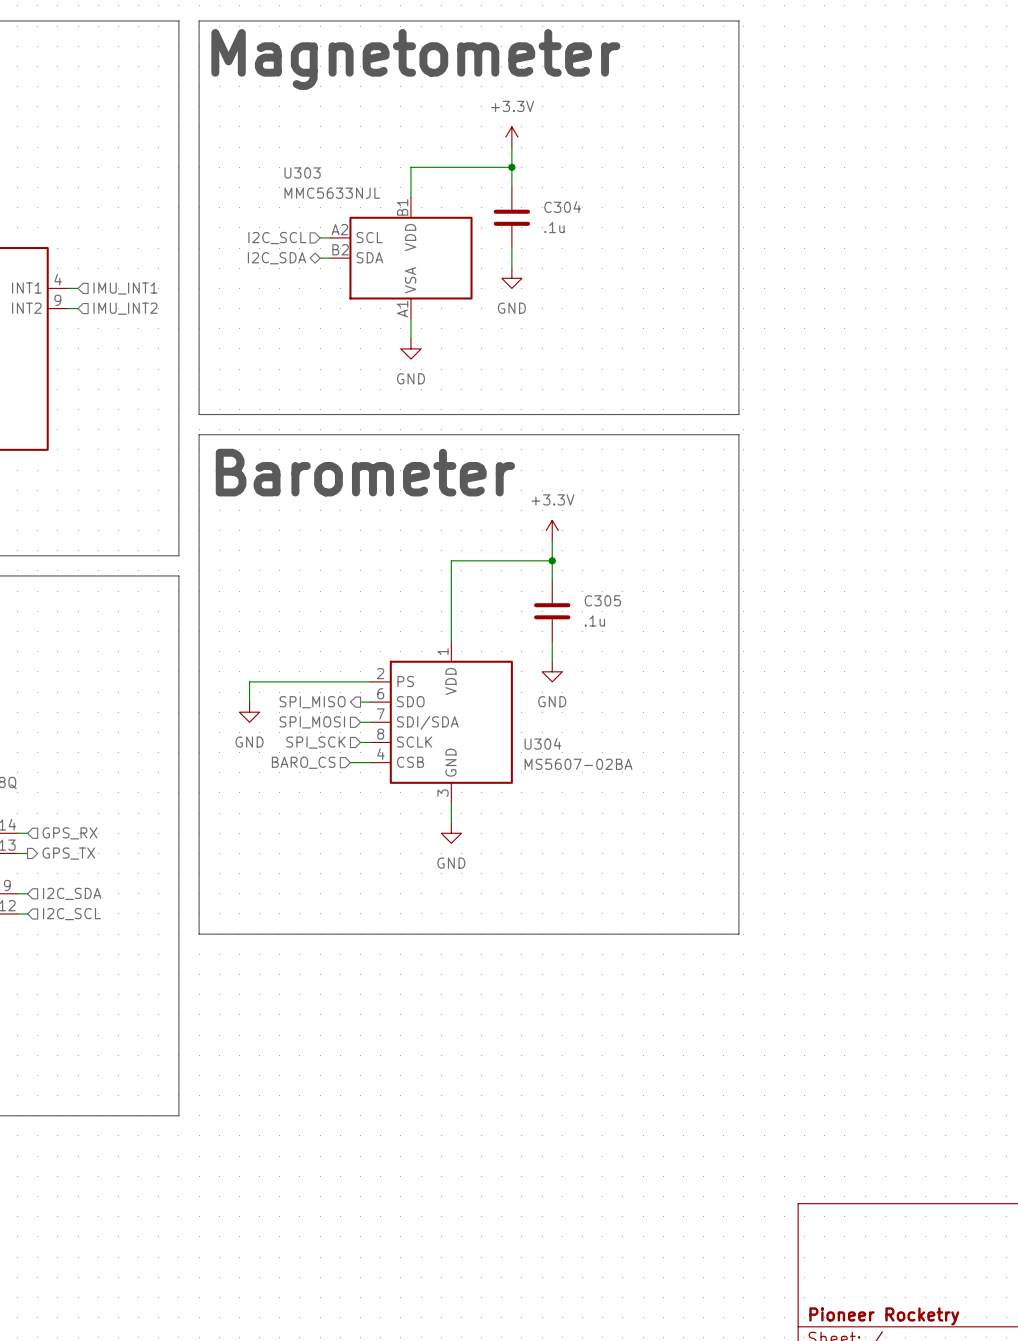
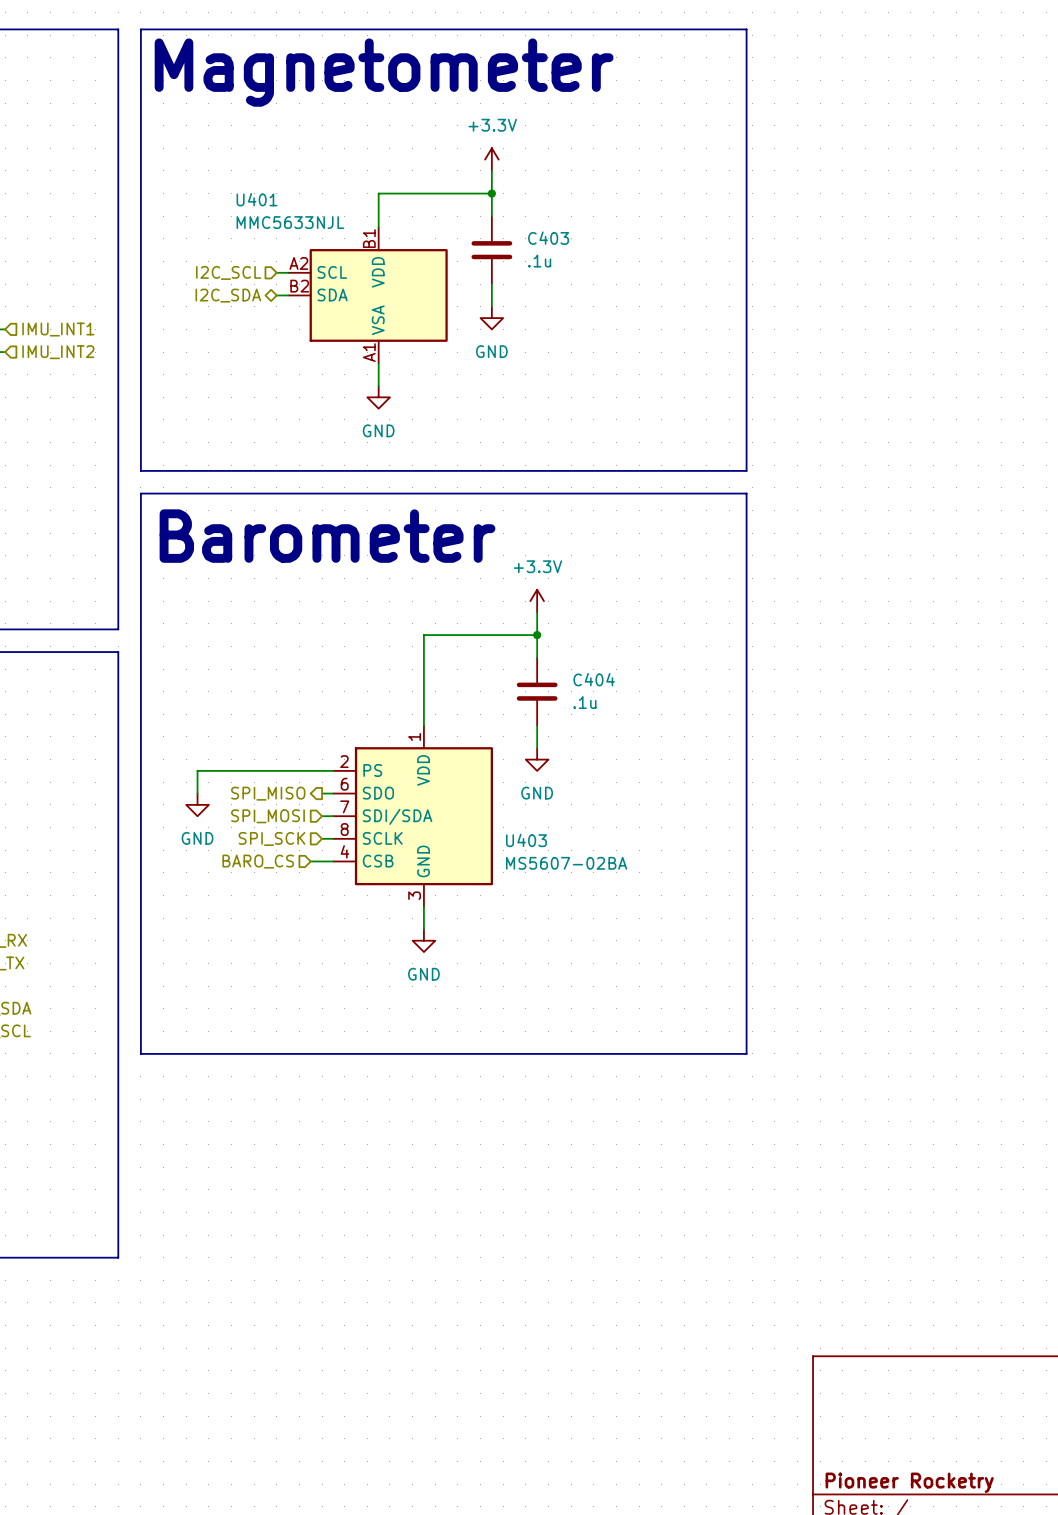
U303 name: U303 (302, 172) -> U401 (257, 199)
C304 name: C304 (562, 207) -> C403 (548, 238)
C305 name: C305 (602, 600) -> C404 (594, 679)
U304 name: U304 (542, 743) -> U403 (526, 840)

